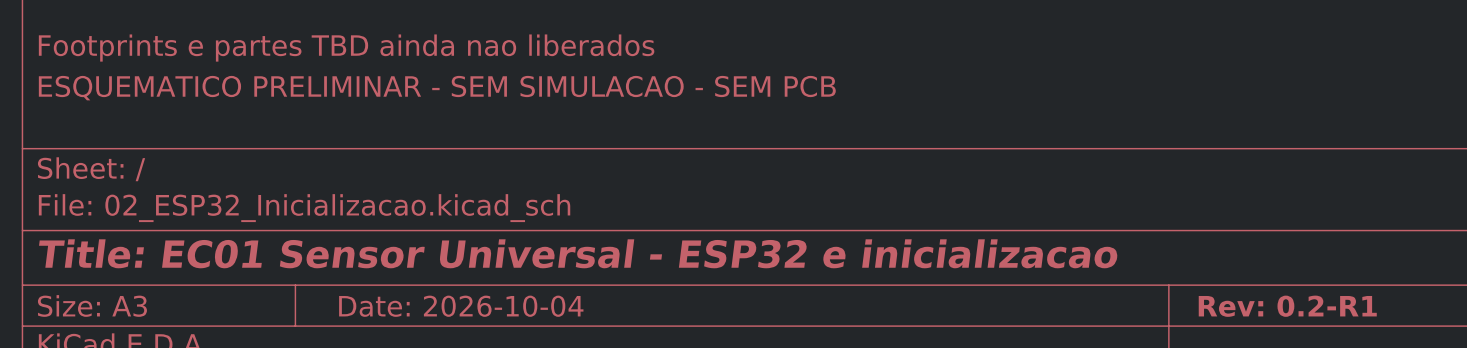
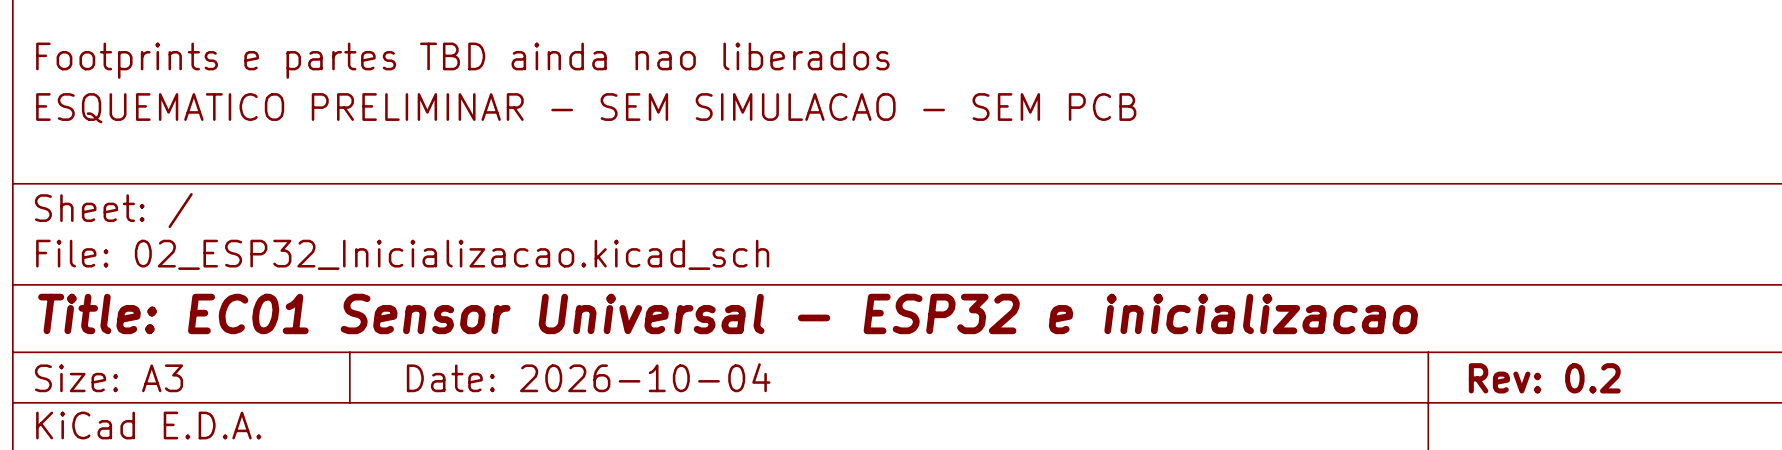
title block: Rev: 0.2-R1 (1287, 306) -> Rev: 0.2 (1544, 378)

